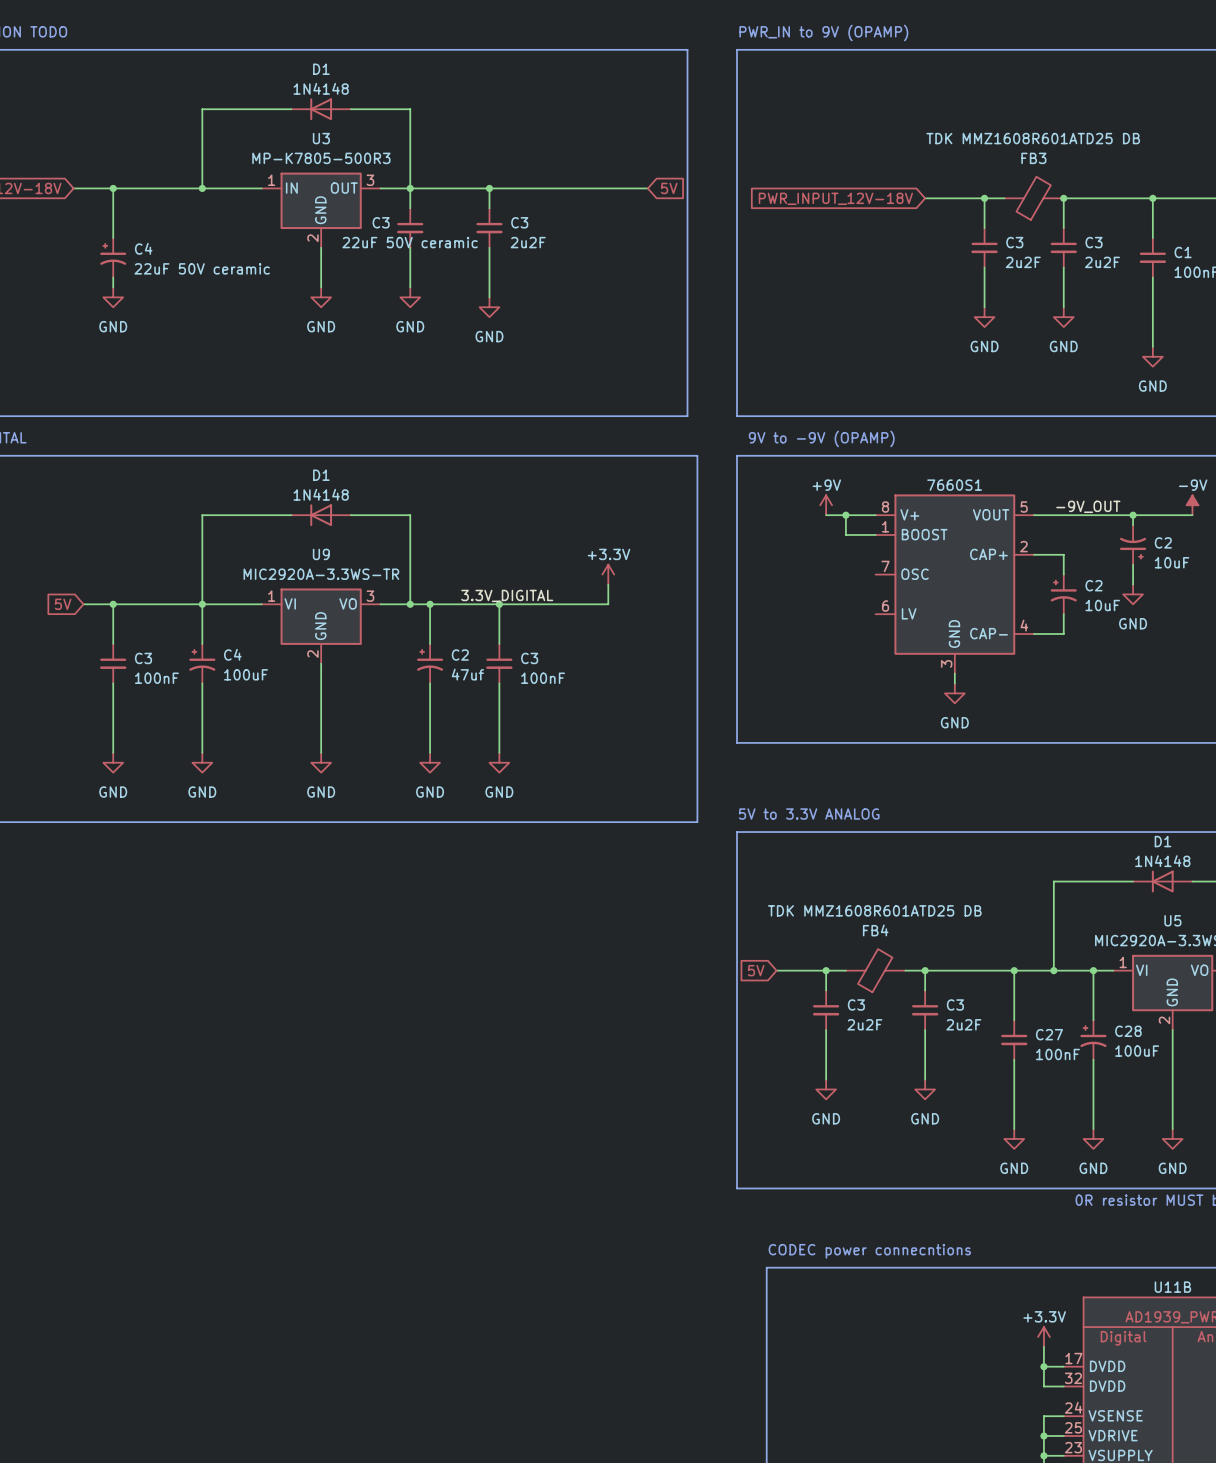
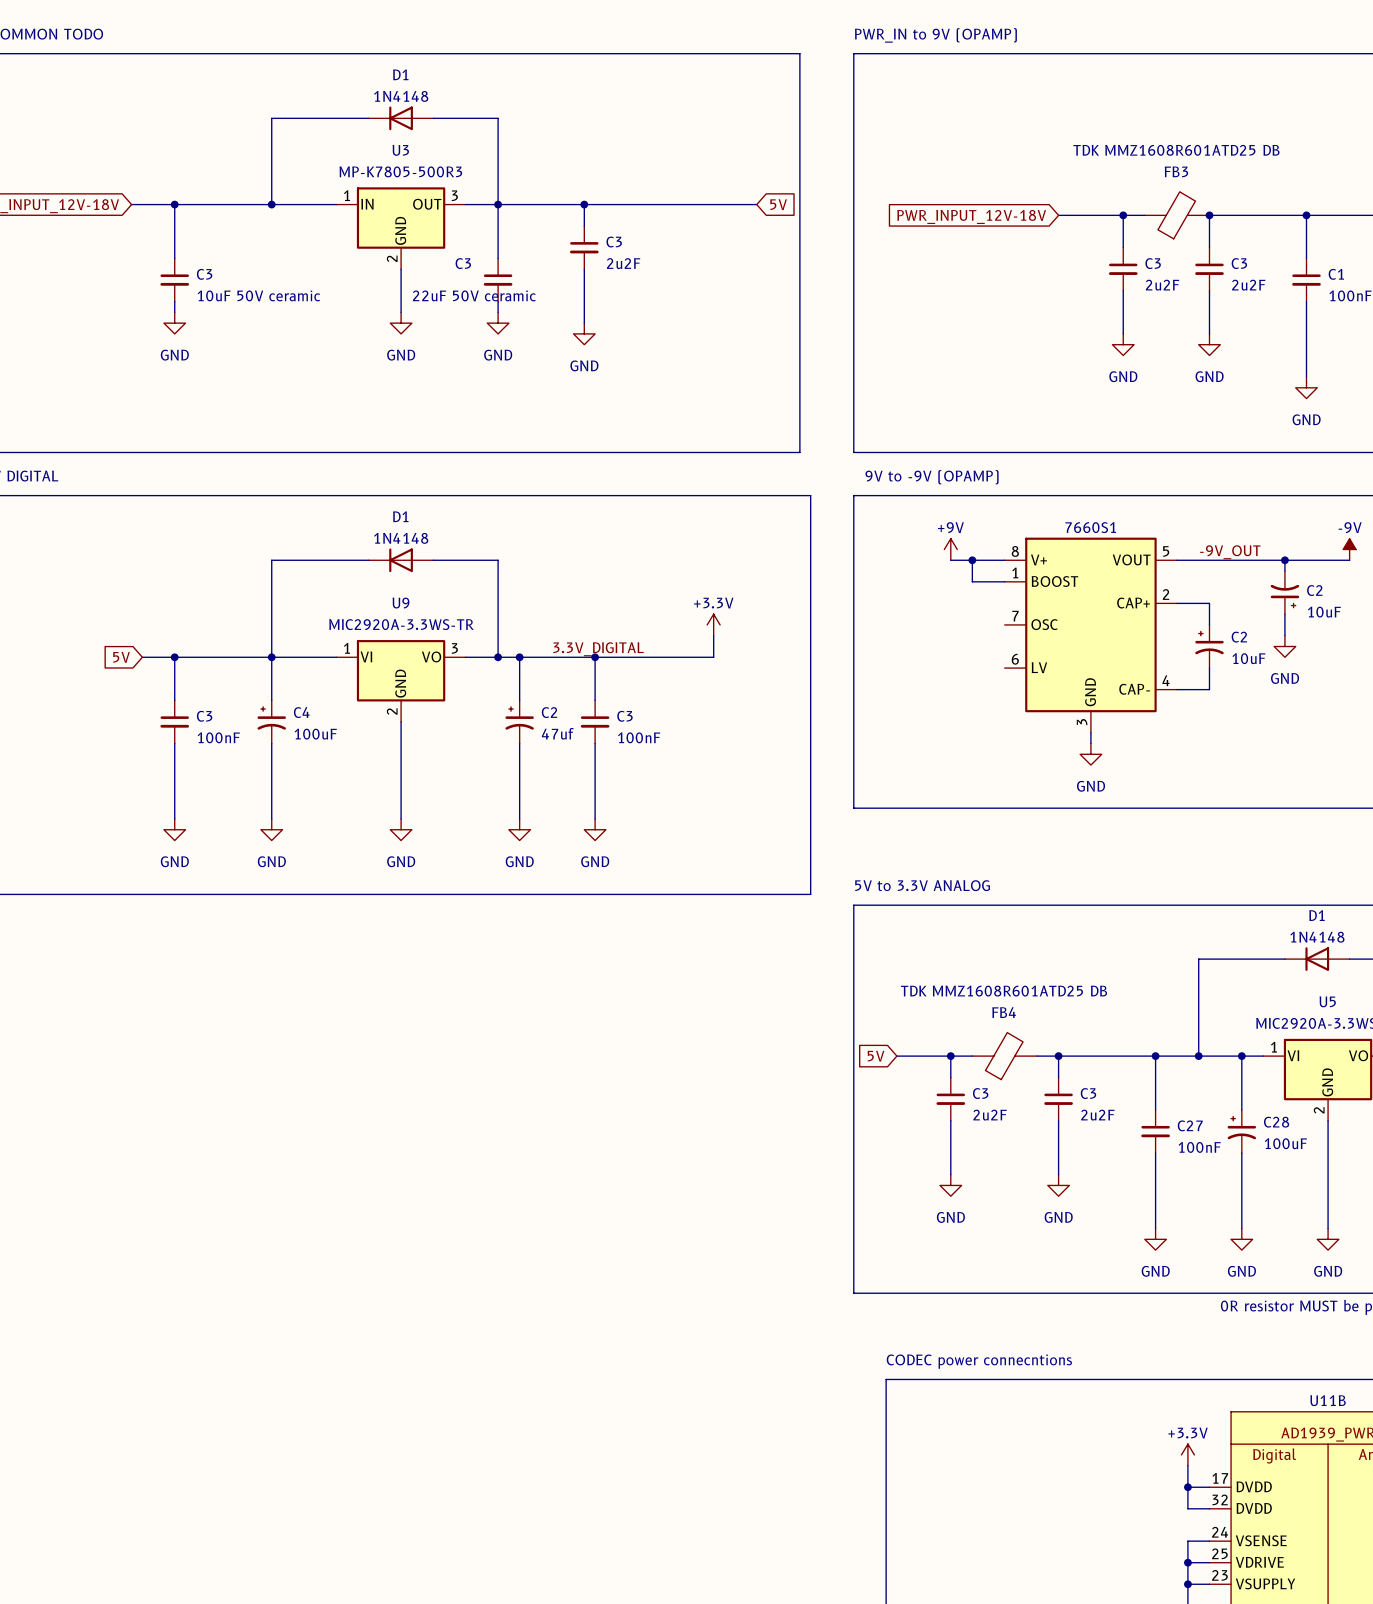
C3 name position: C3 (381, 222) -> C3 (463, 263)
C3 position: (410, 228) -> (498, 280)
C3 value position: 22uF 50V ceramic (410, 242) -> 22uF 50V ceramic (474, 295)
C4: 22uF 50V ceramic (113, 257) -> none
C3: none -> 10uF 50V ceramic (174, 280)

